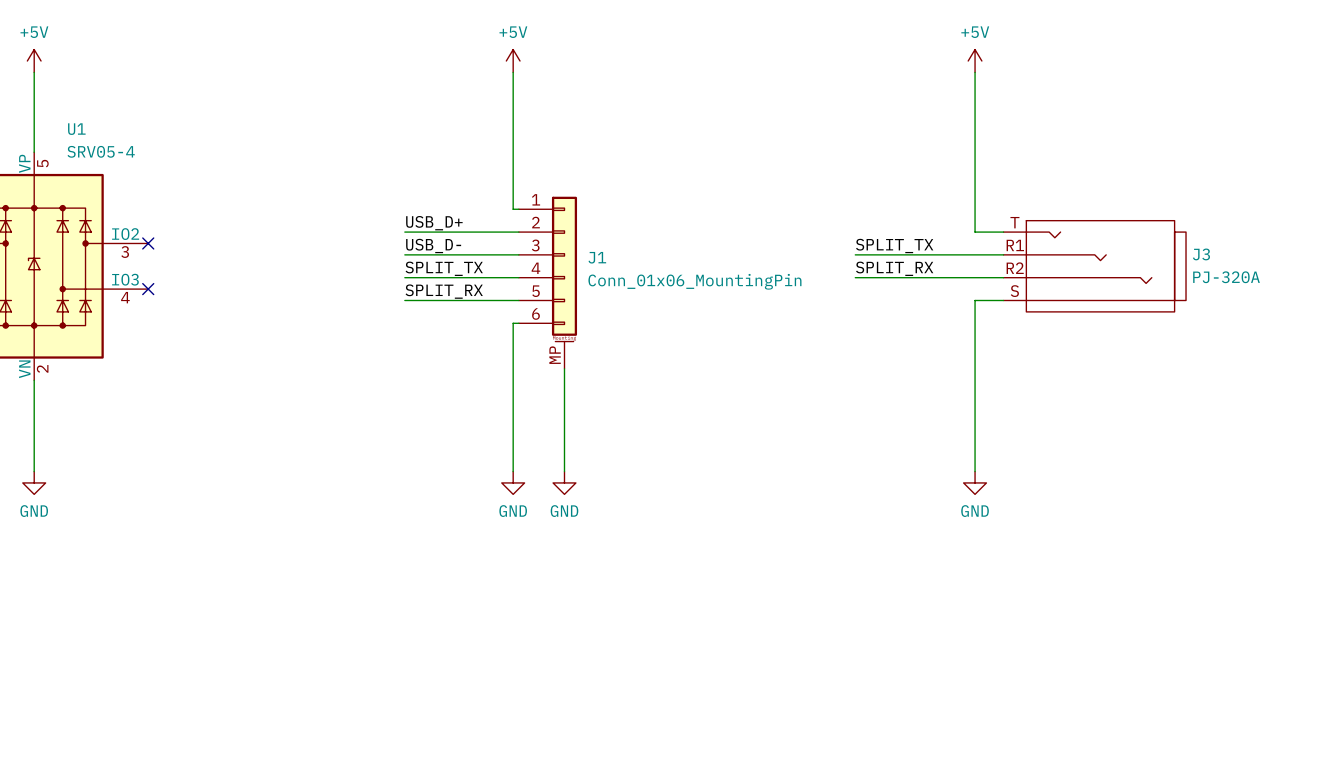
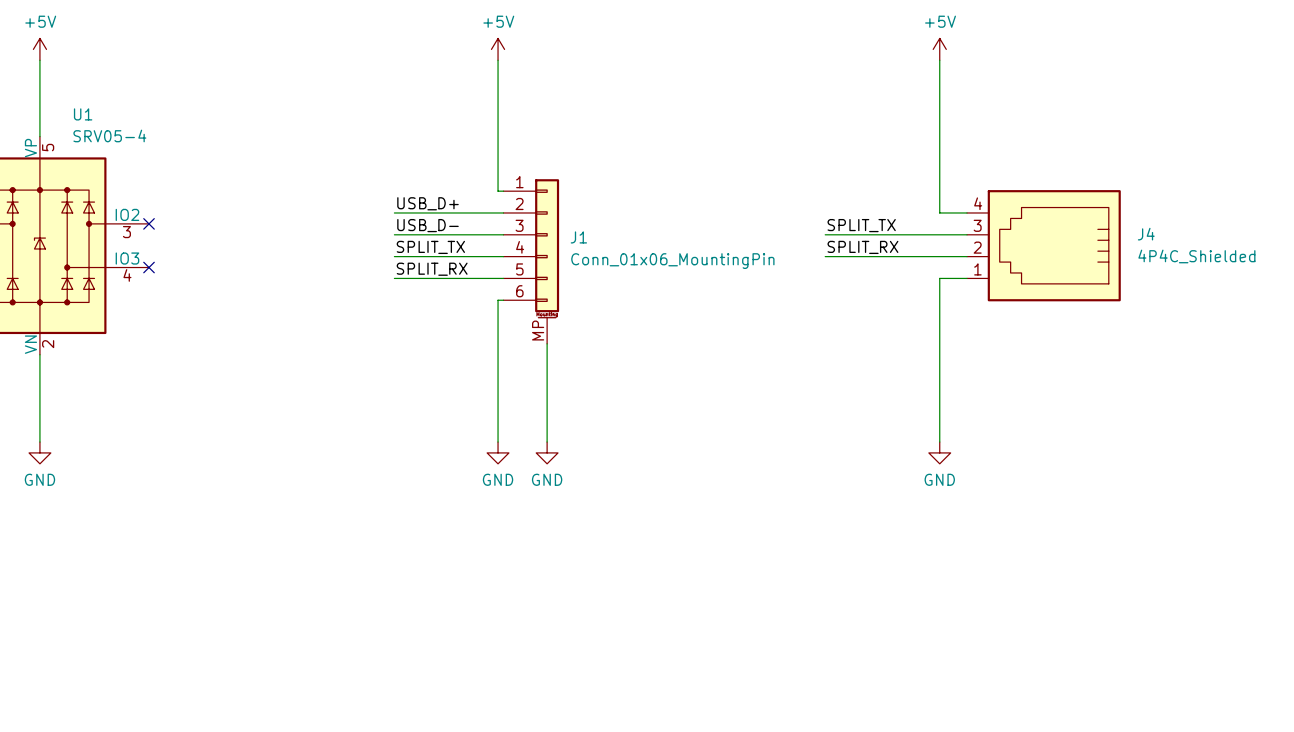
J4: none -> 4P4C_Shielded (1043, 245)
J3: PJ-320A (1094, 266) -> none

